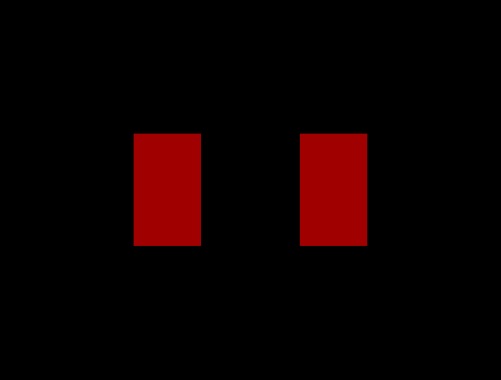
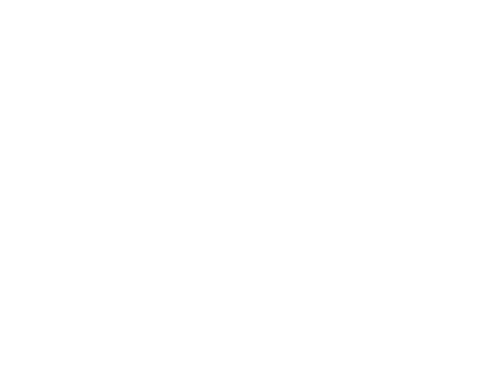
drawing: [133, 133, 202, 246] -> none
drawing: [299, 133, 368, 246] -> none

